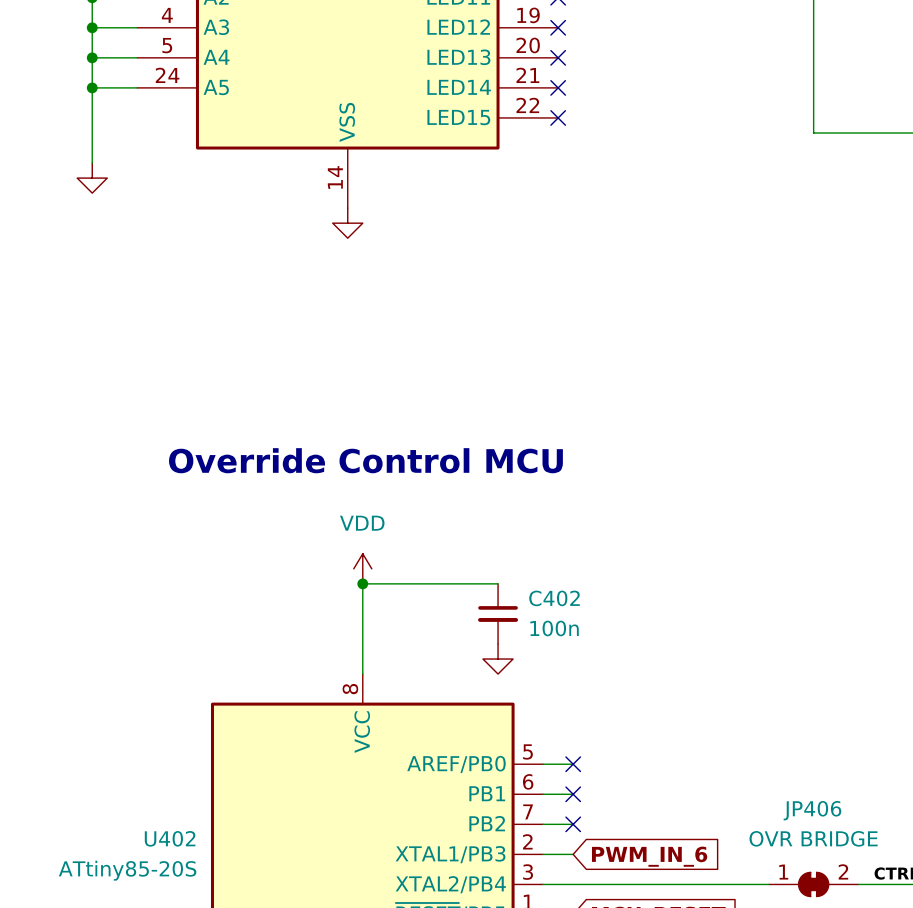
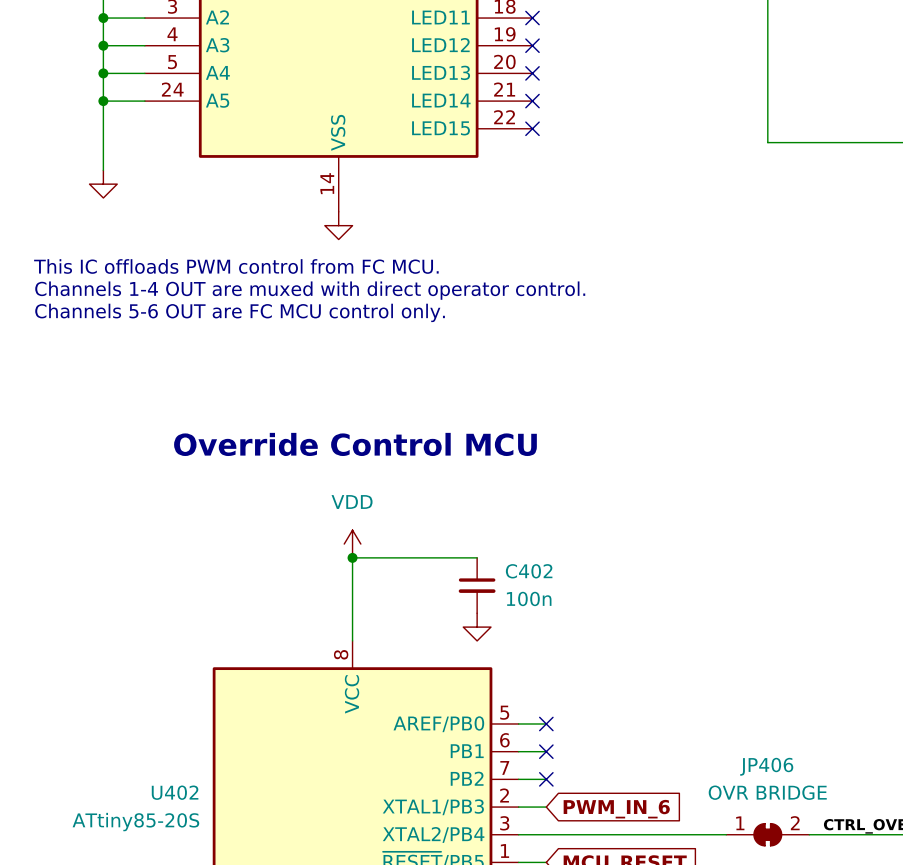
text: none -> This IC offloads PWM control from FC MCU. (236, 266)
text: none -> Channels 1-4 OUT are muxed with direct operator control. (310, 290)
text: none -> Channels 5-6 OUT are FC MCU control only. (240, 312)

